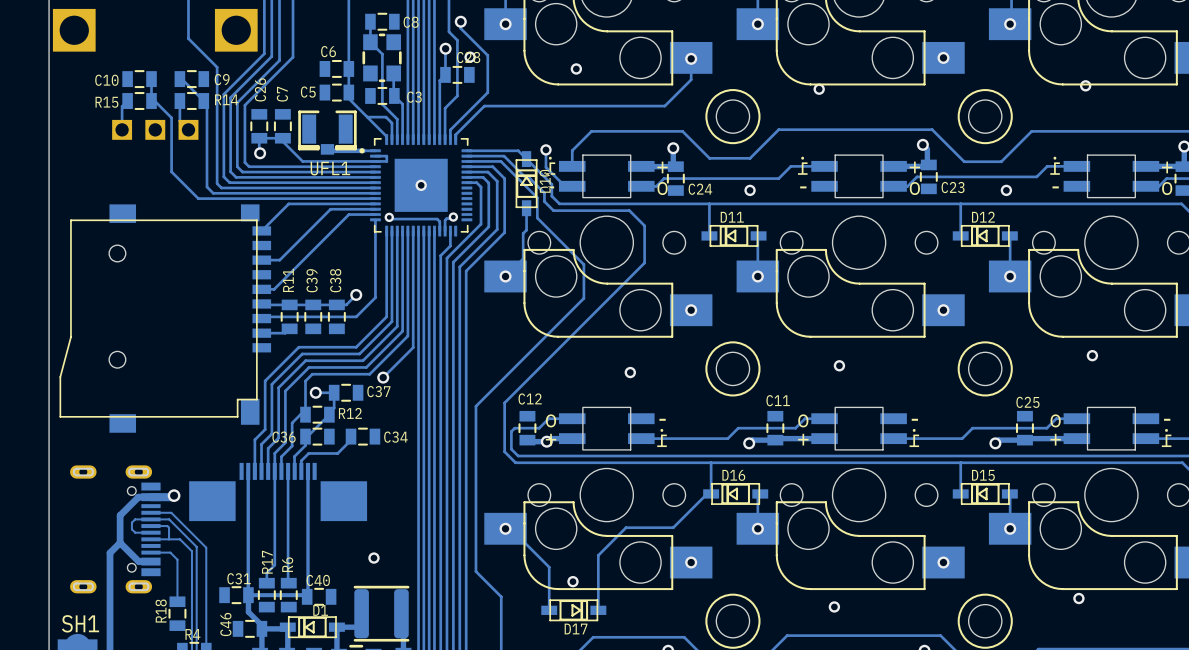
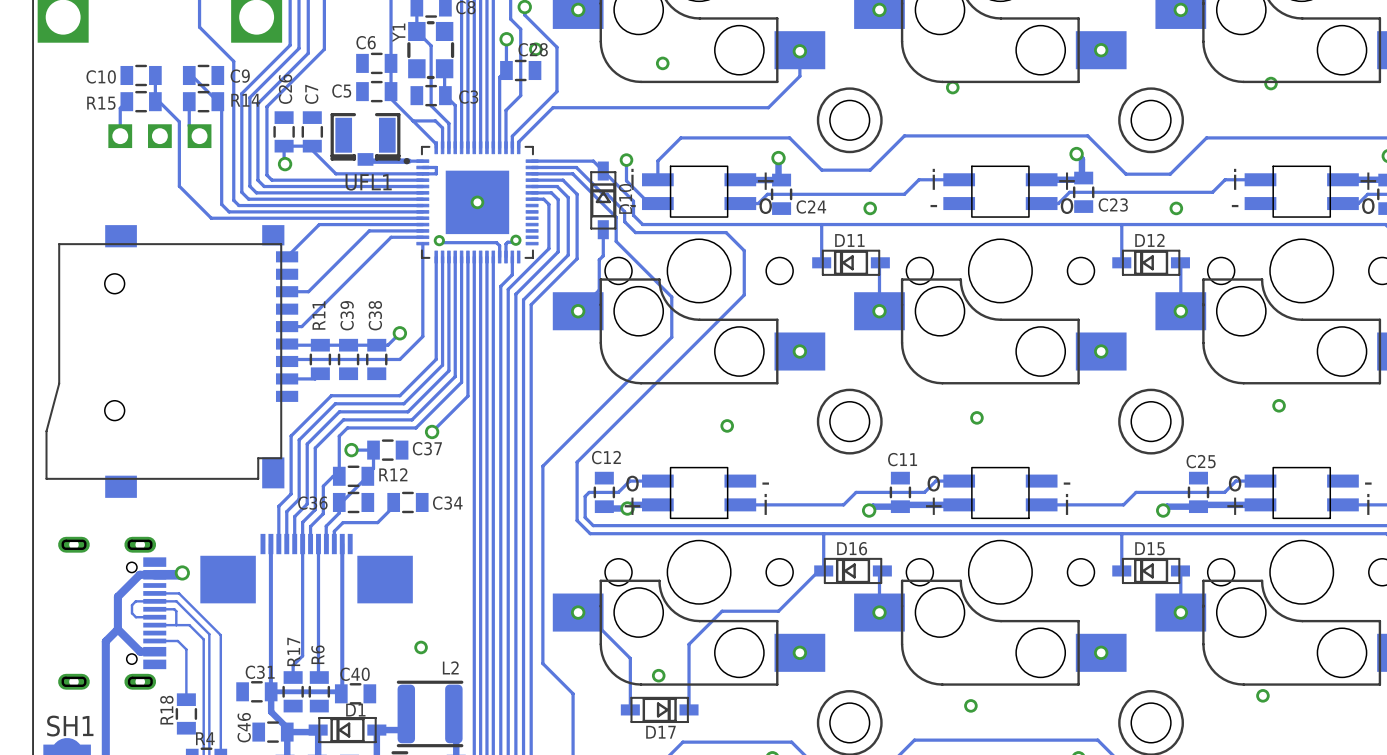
Y1 name: none -> Y1 (398, 32)
L2 name: none -> L2 (450, 667)

